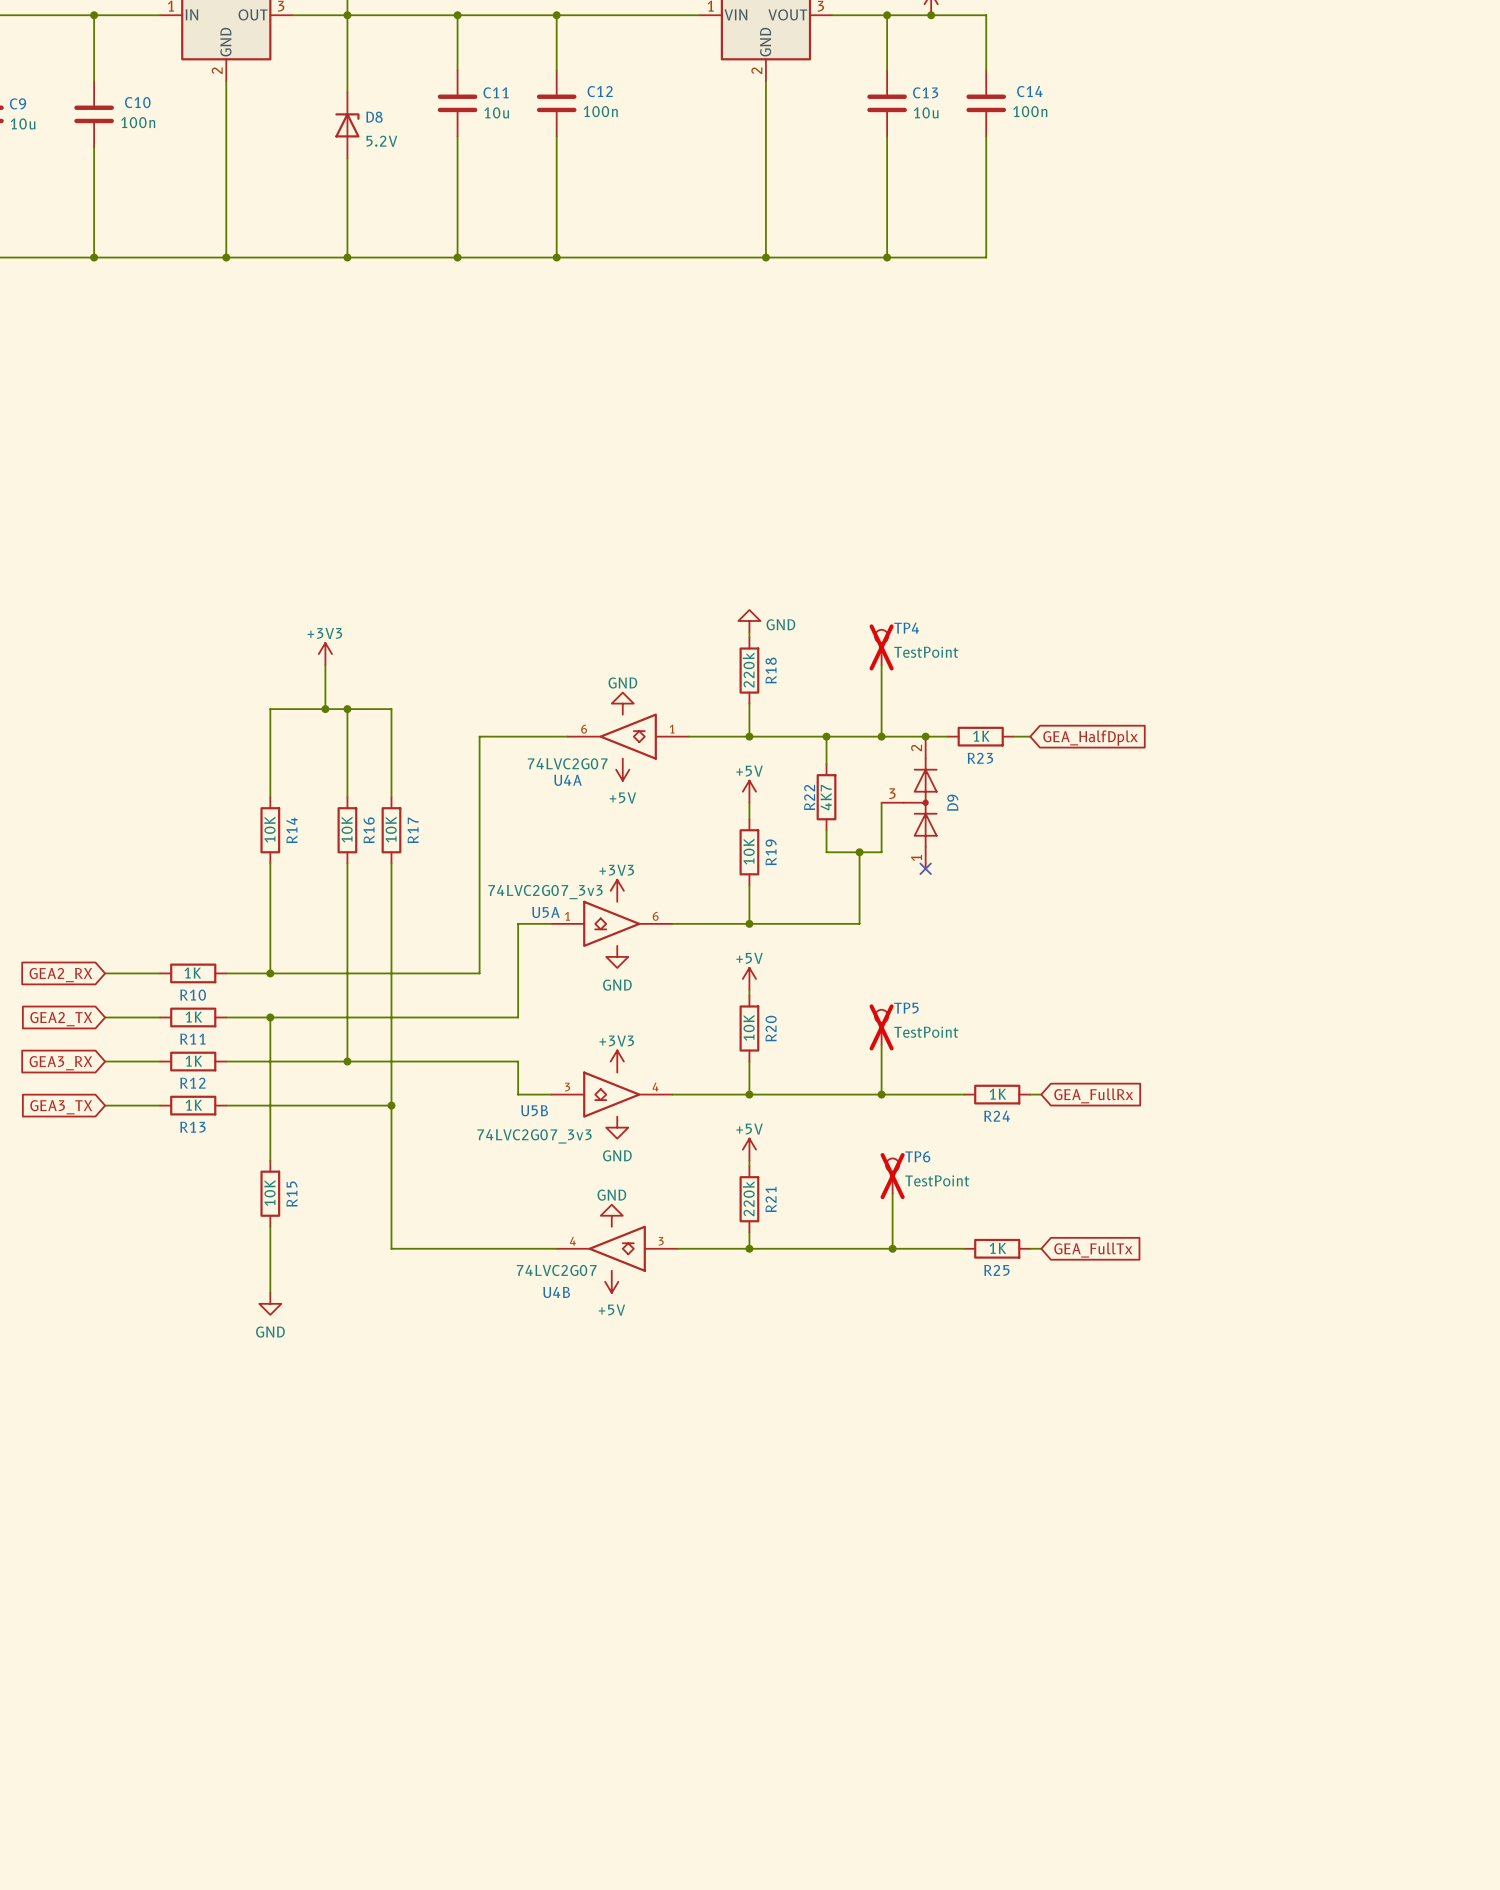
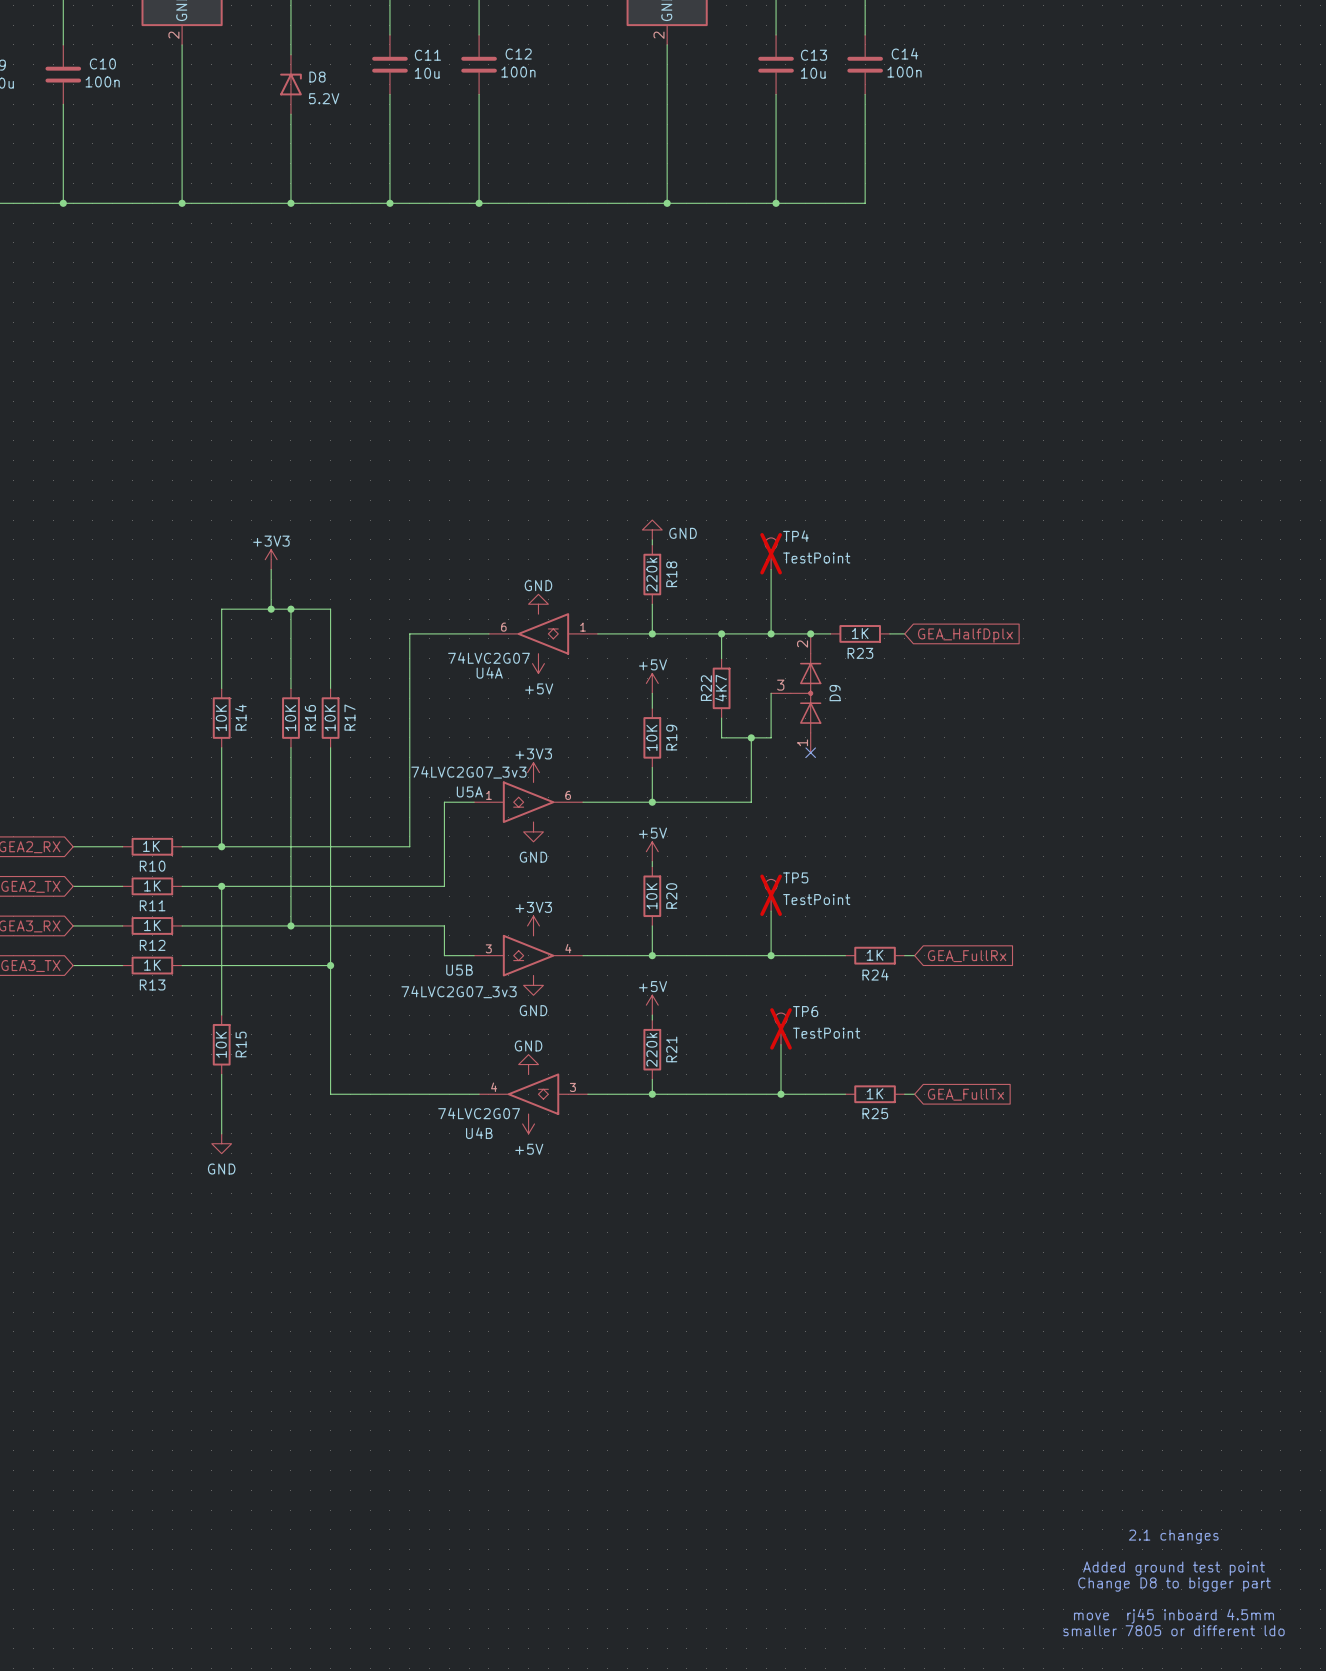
text: none -> 2.1 changes (1173, 1536)
text: none -> Added ground test point (1174, 1568)
text: none -> Change D8 to bigger part (1174, 1584)
text: none -> move rj45 inboard 4.5mm (1174, 1616)
text: none -> smaller 7805 or different ldo (1174, 1630)

